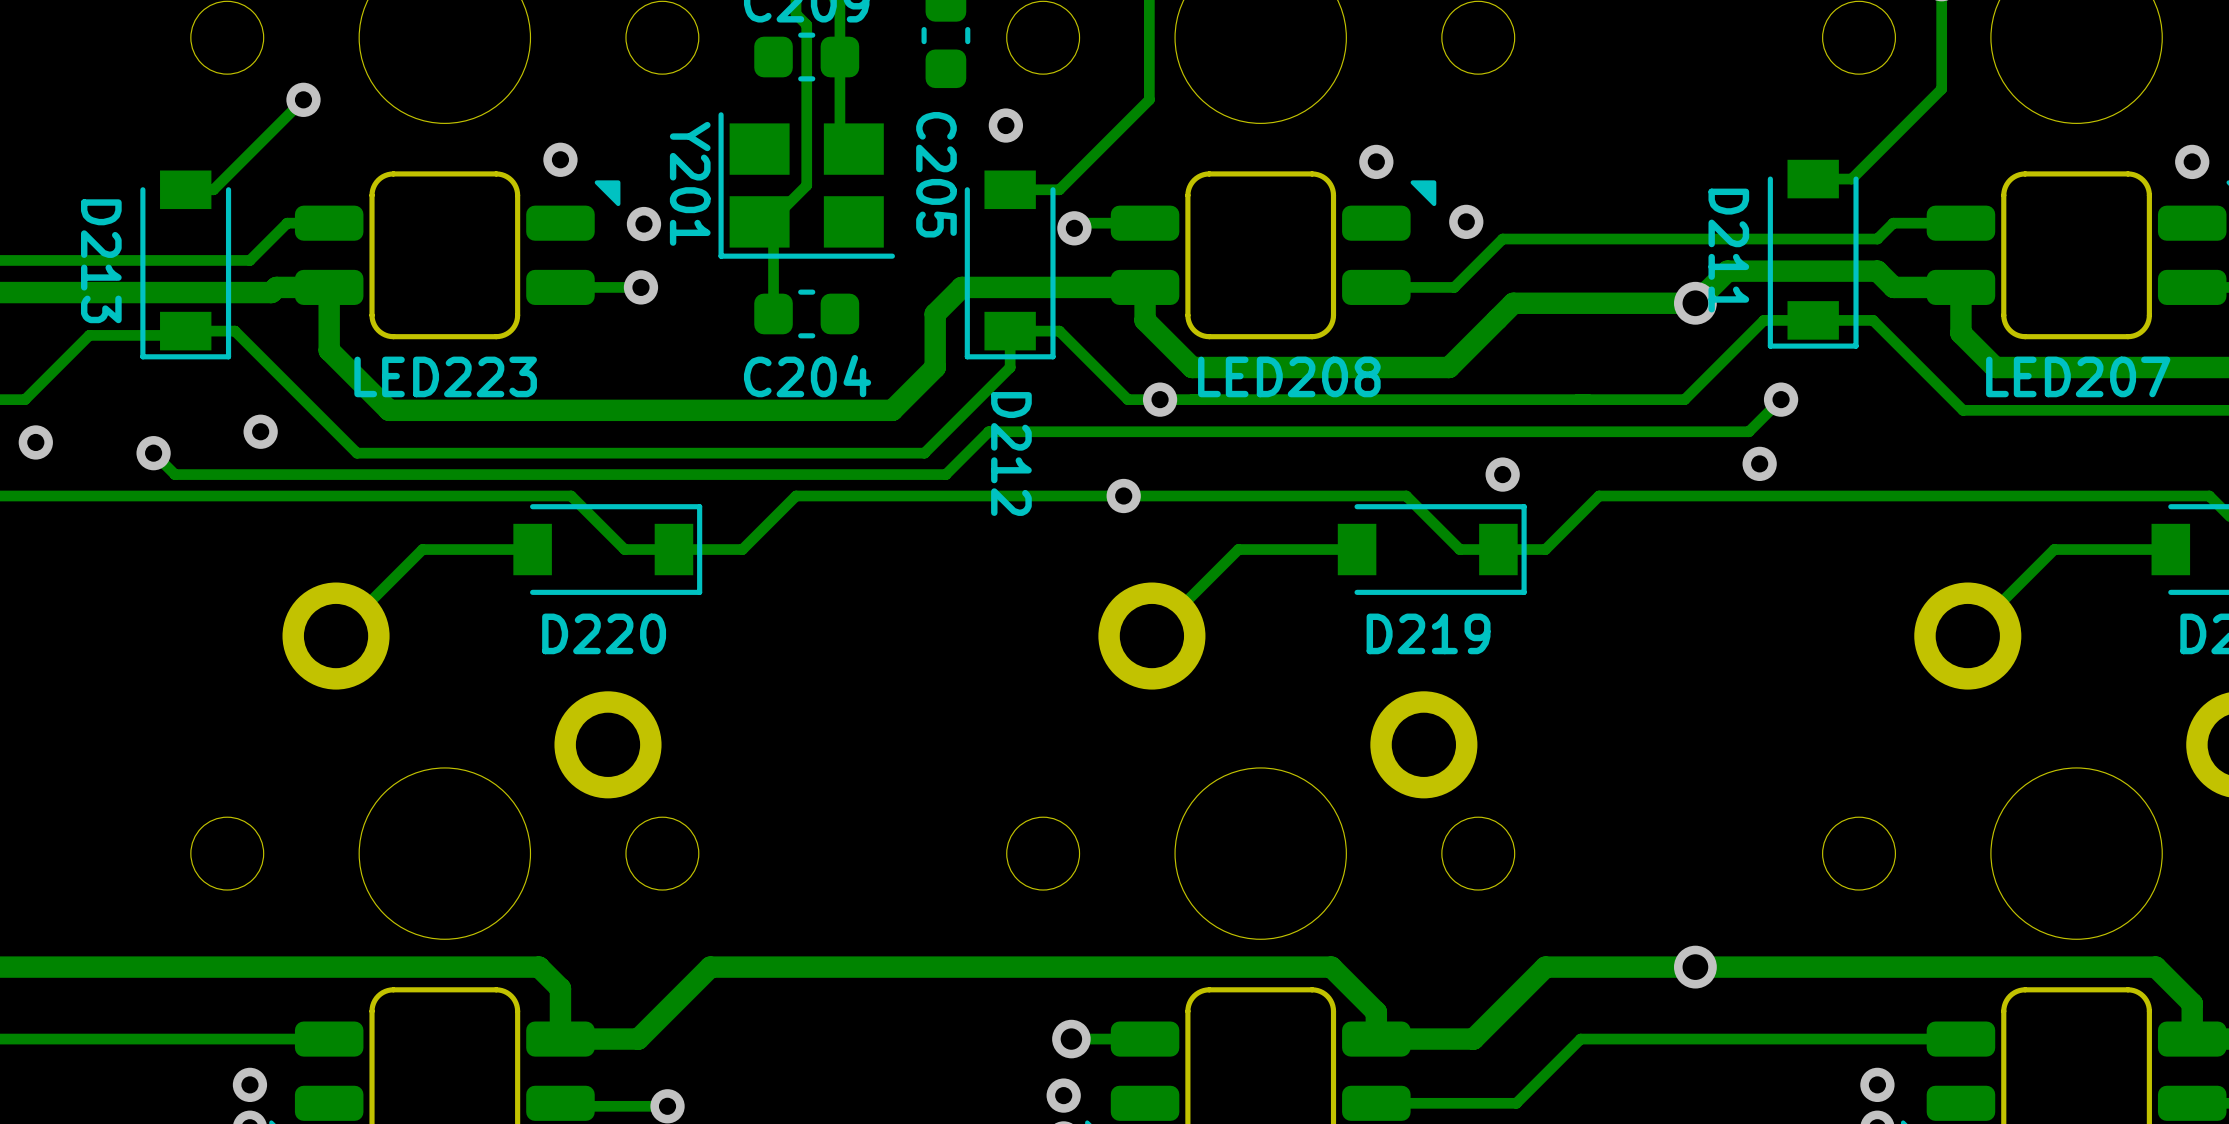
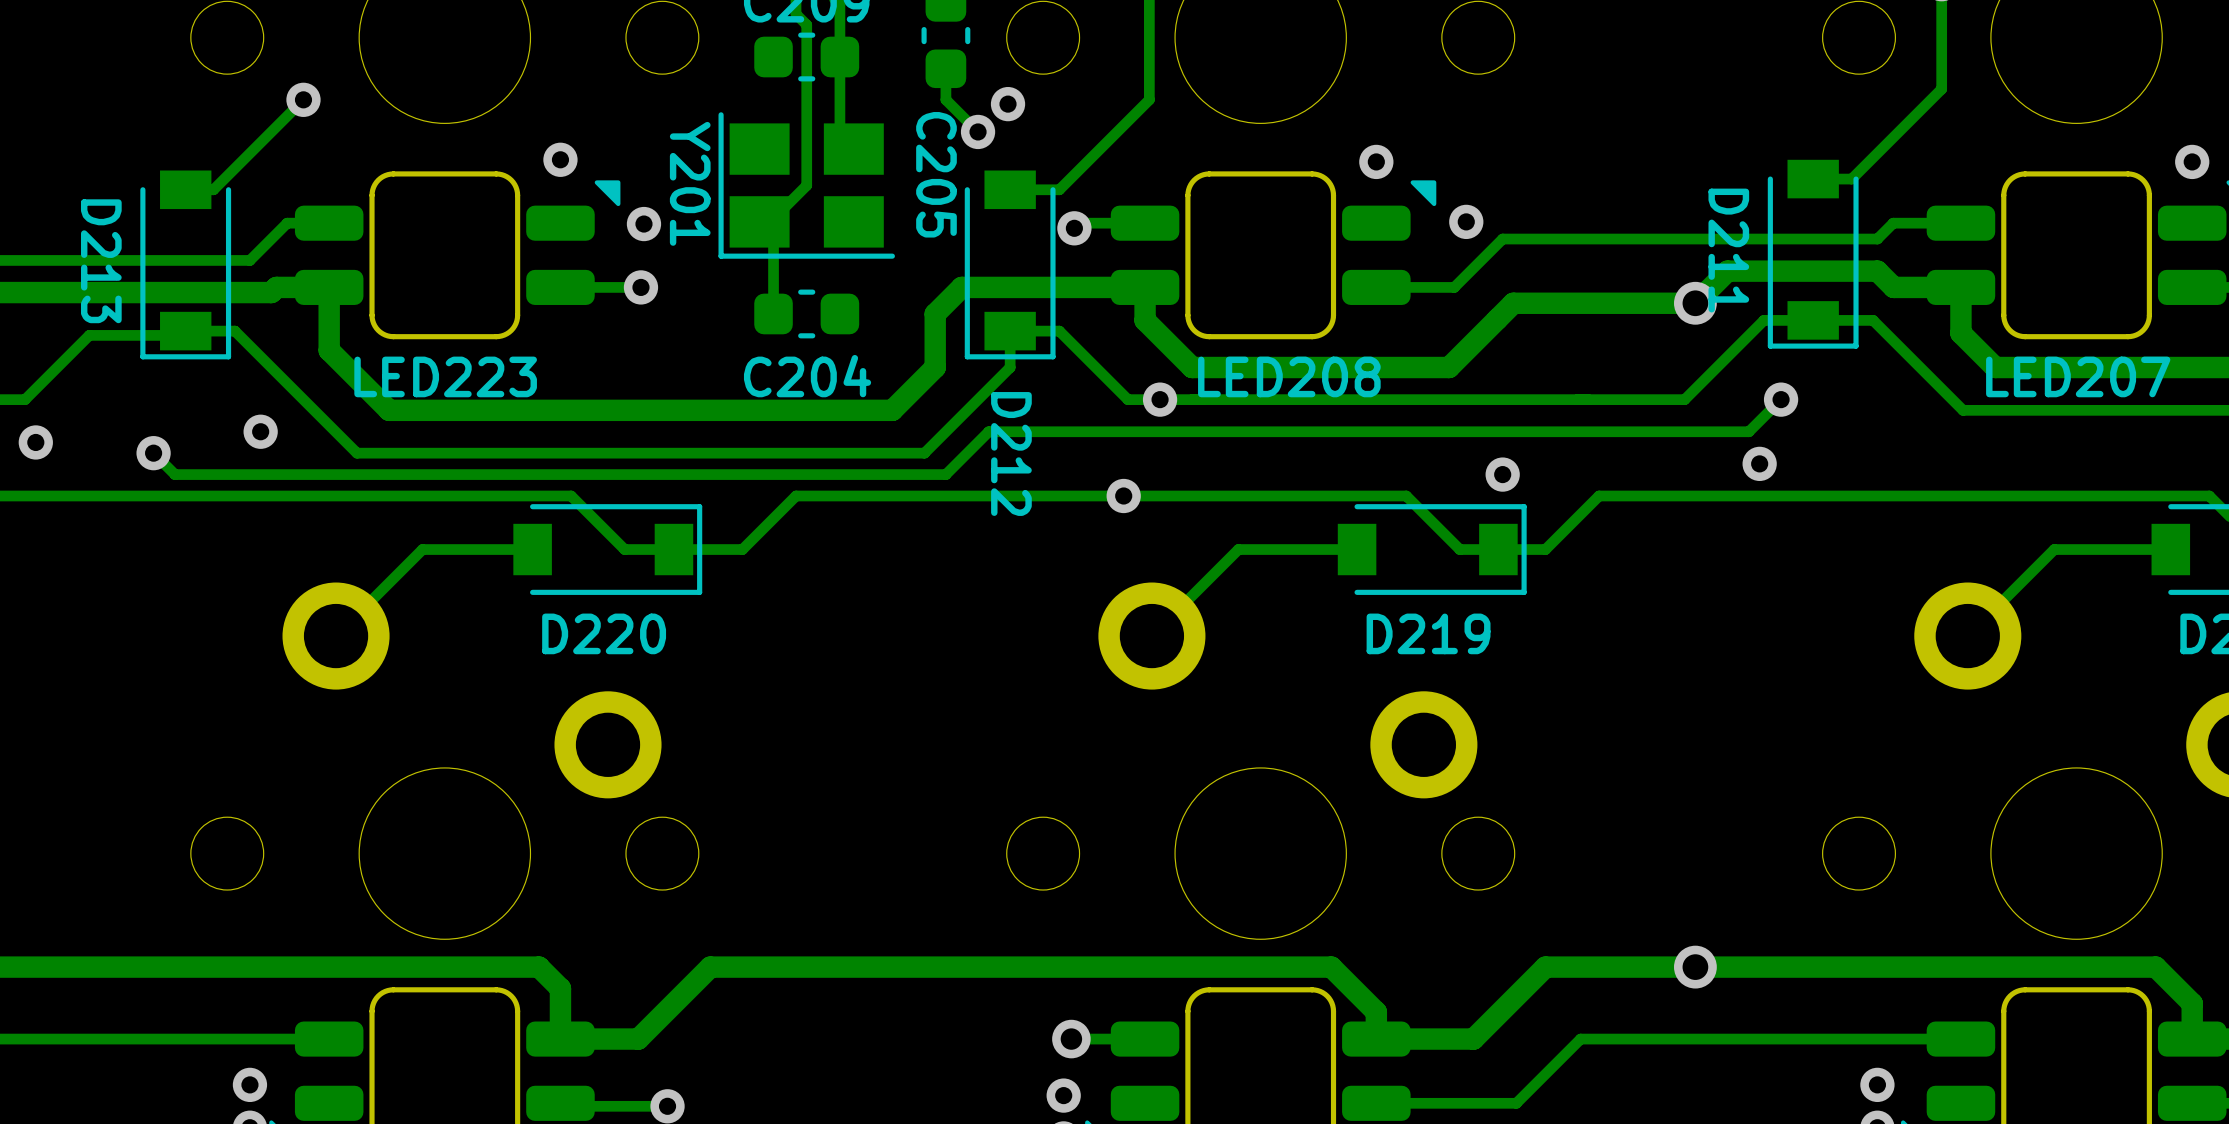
track: none -> (945, 68) (945, 99) (978, 131)
via: none -> (1008, 104)
via: (1005, 125) -> none
via: none -> (978, 131)

